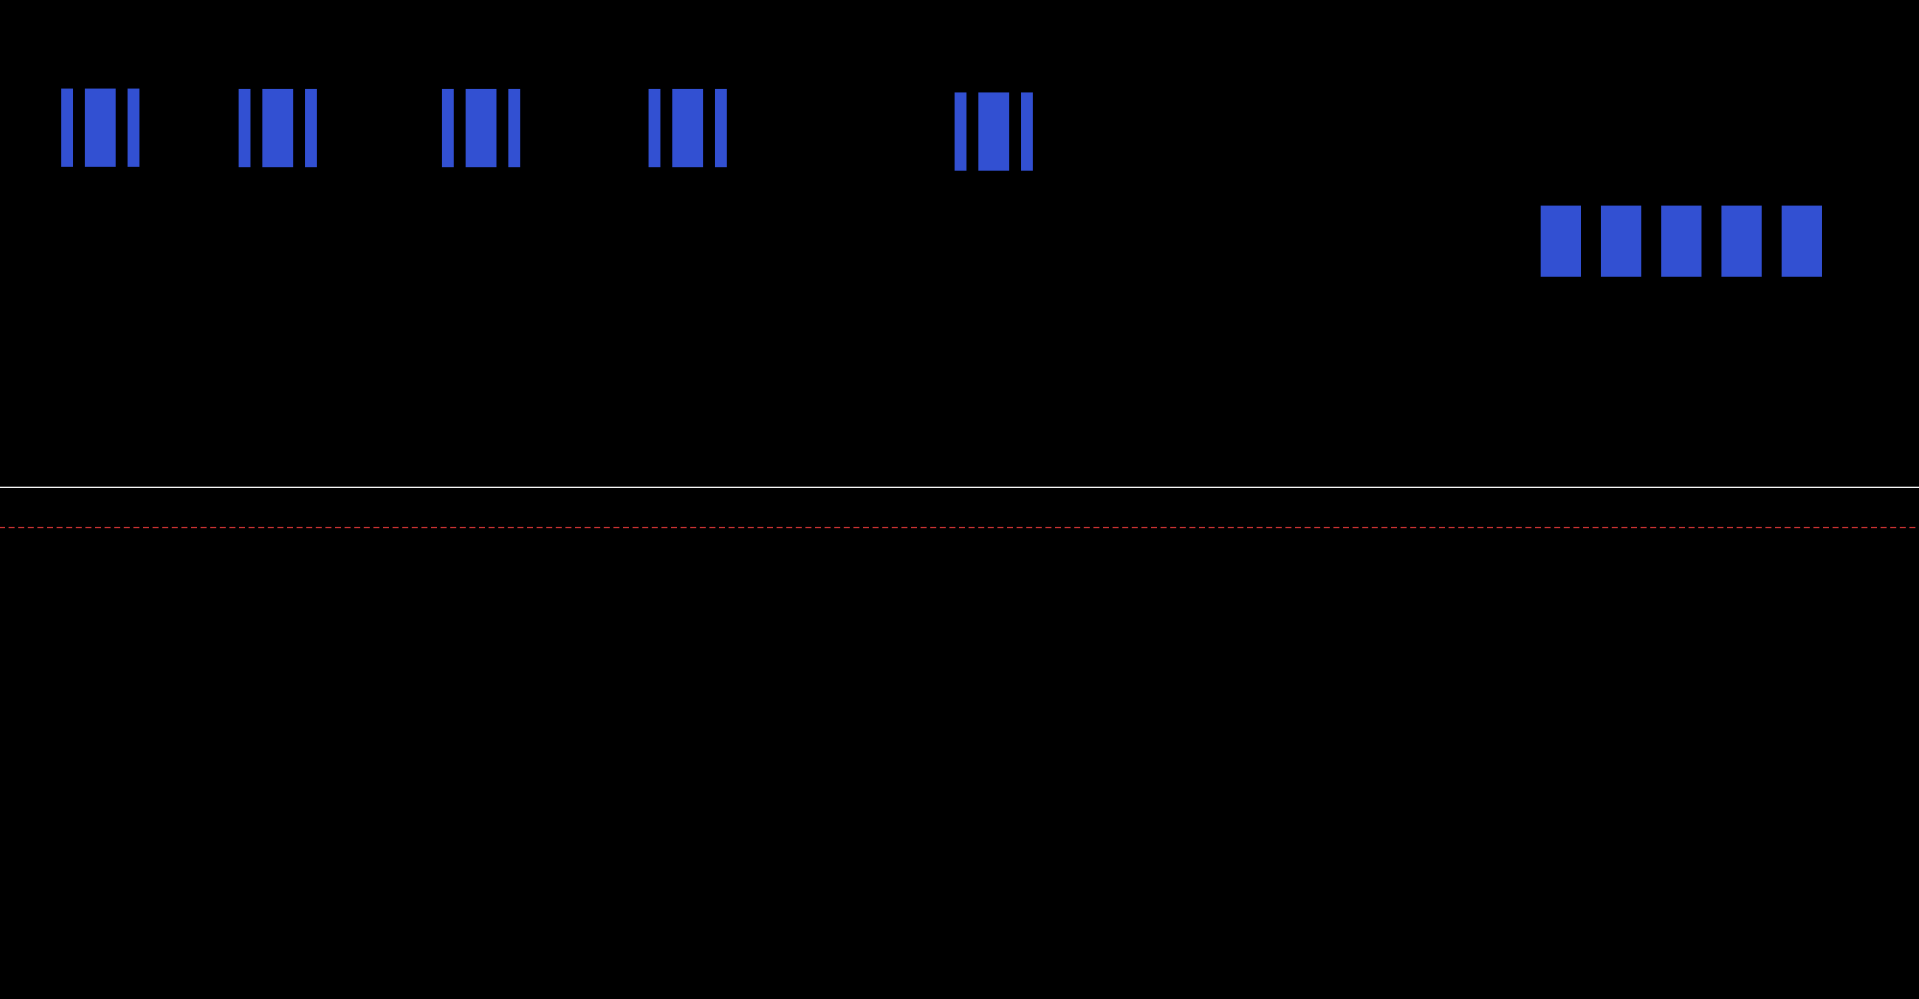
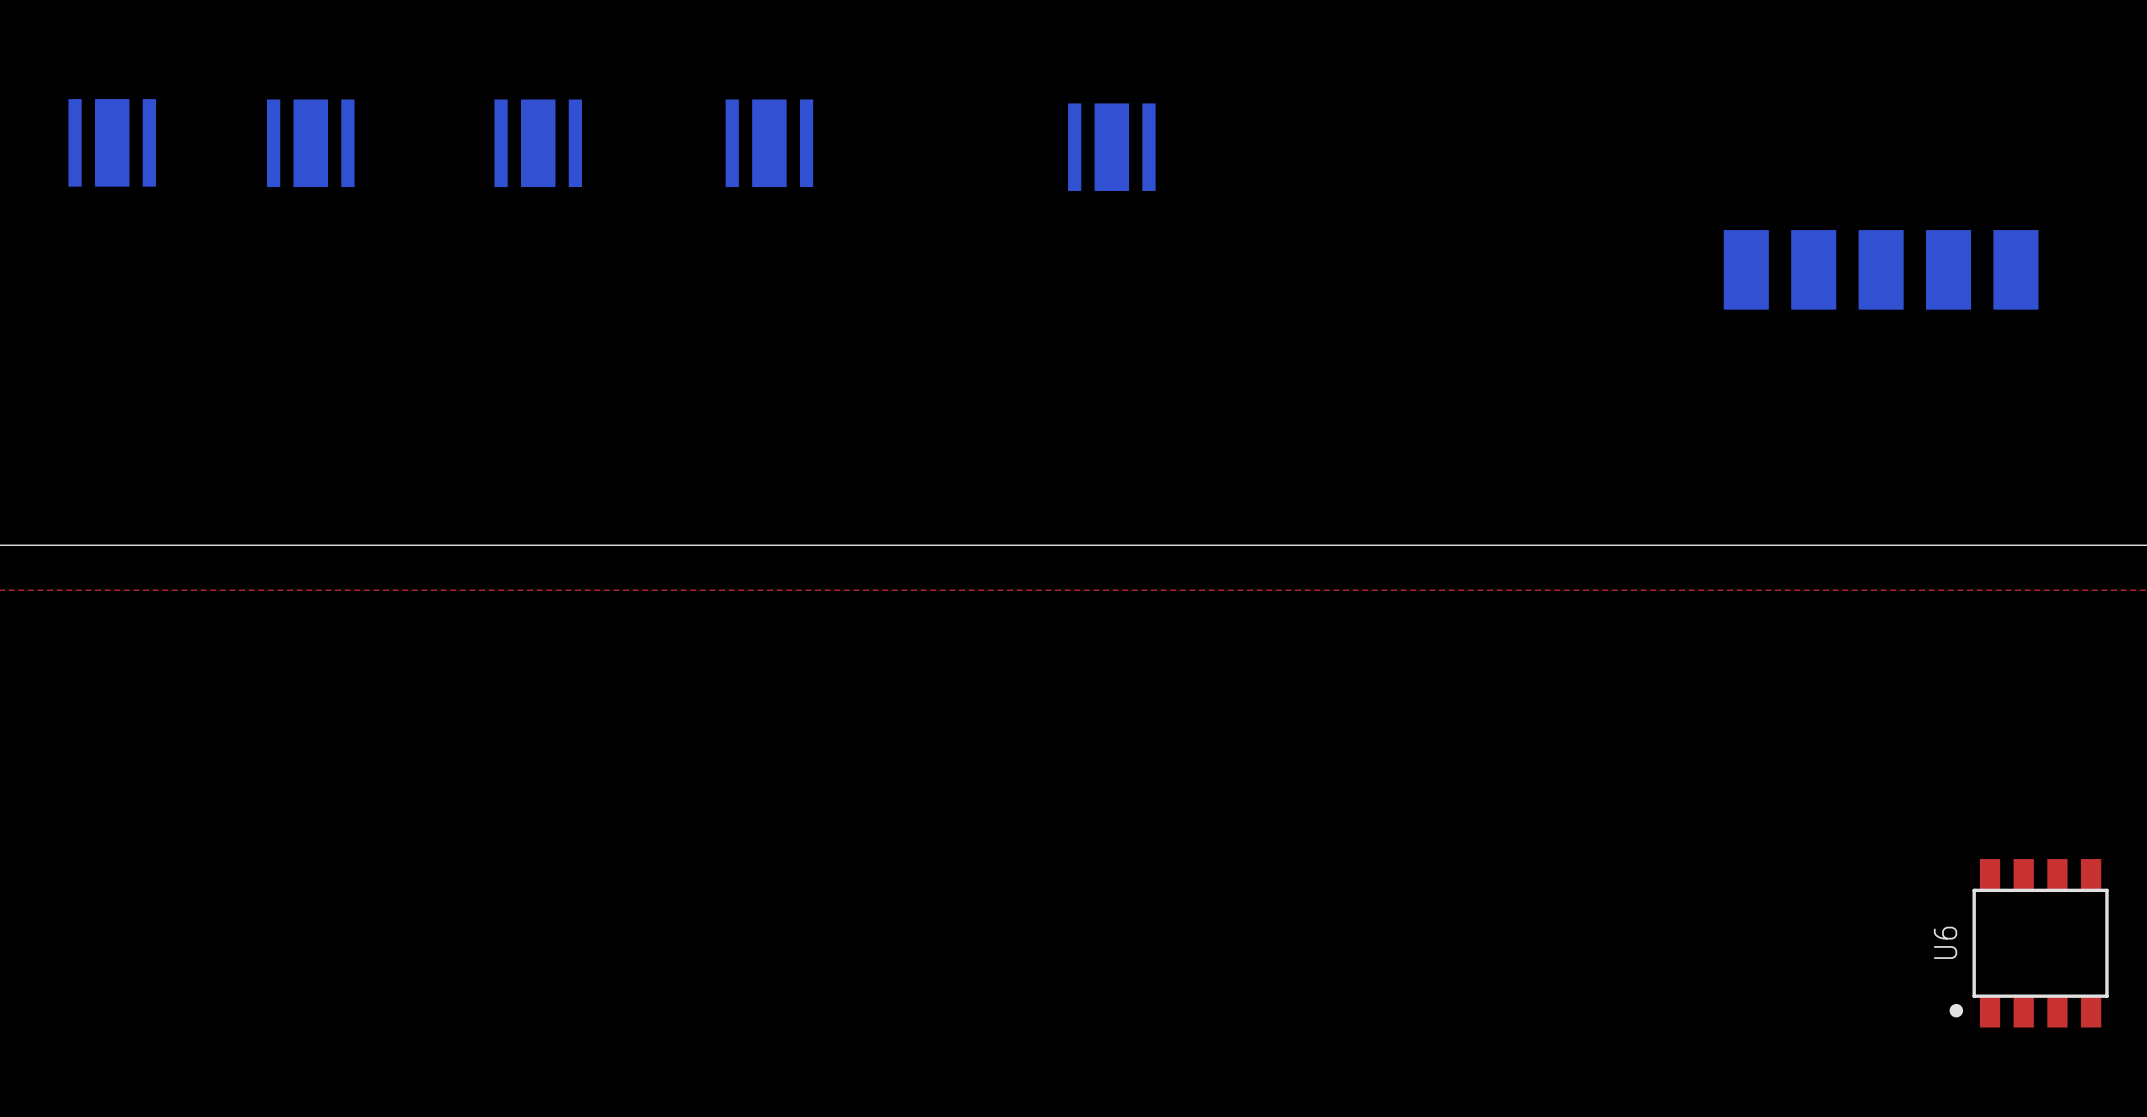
U6: none -> (2029, 943)

